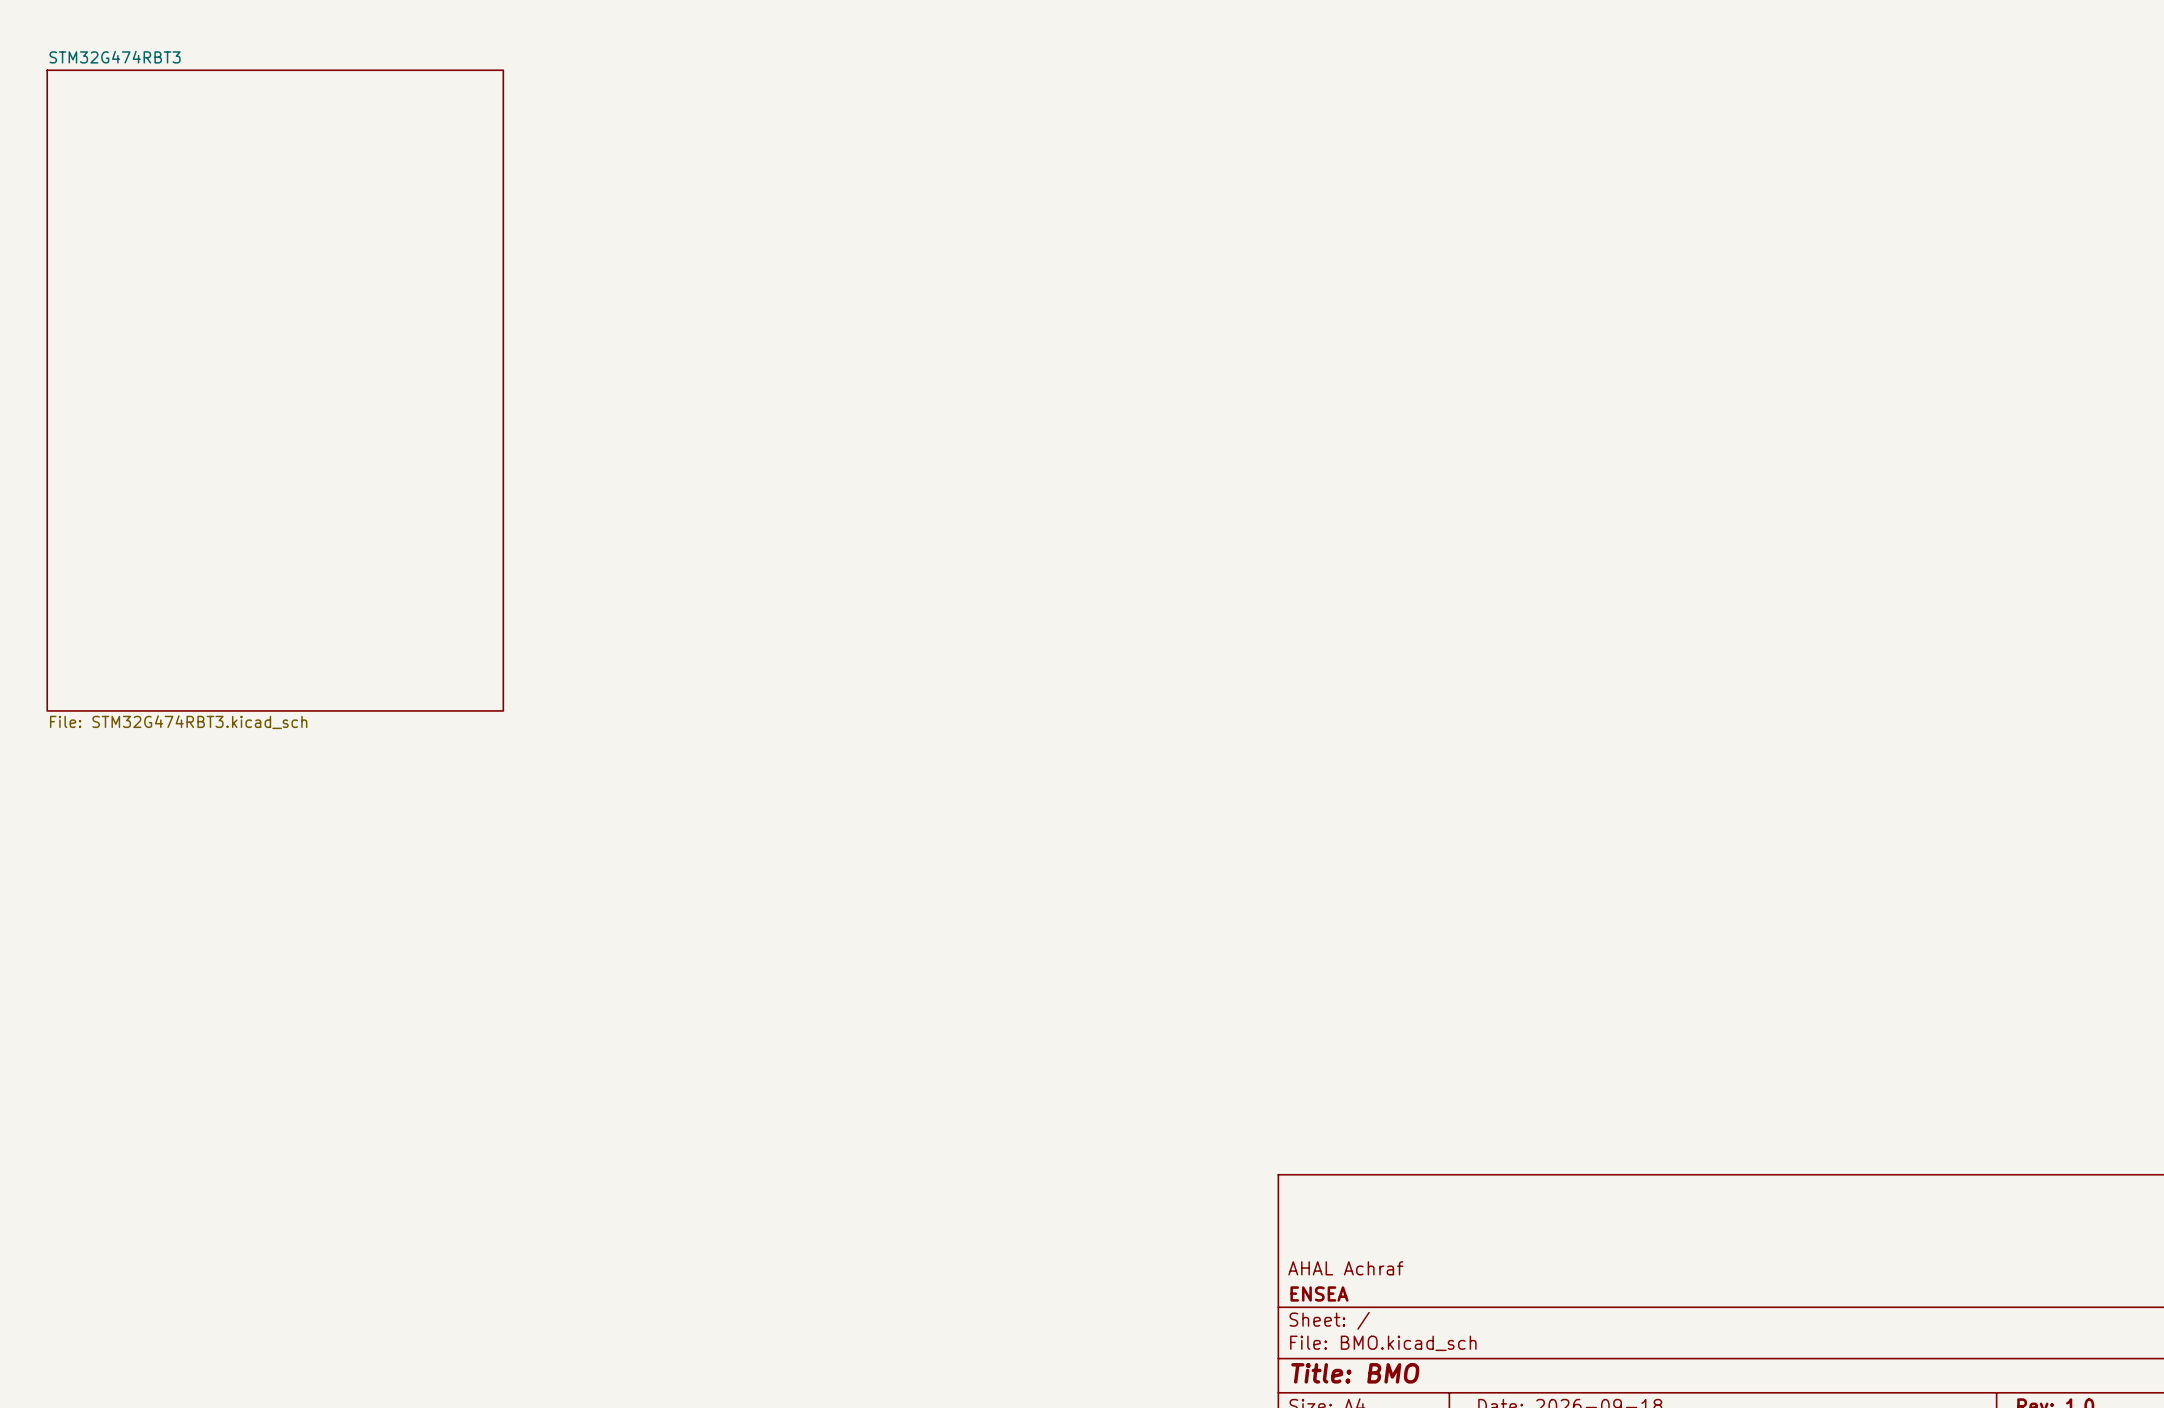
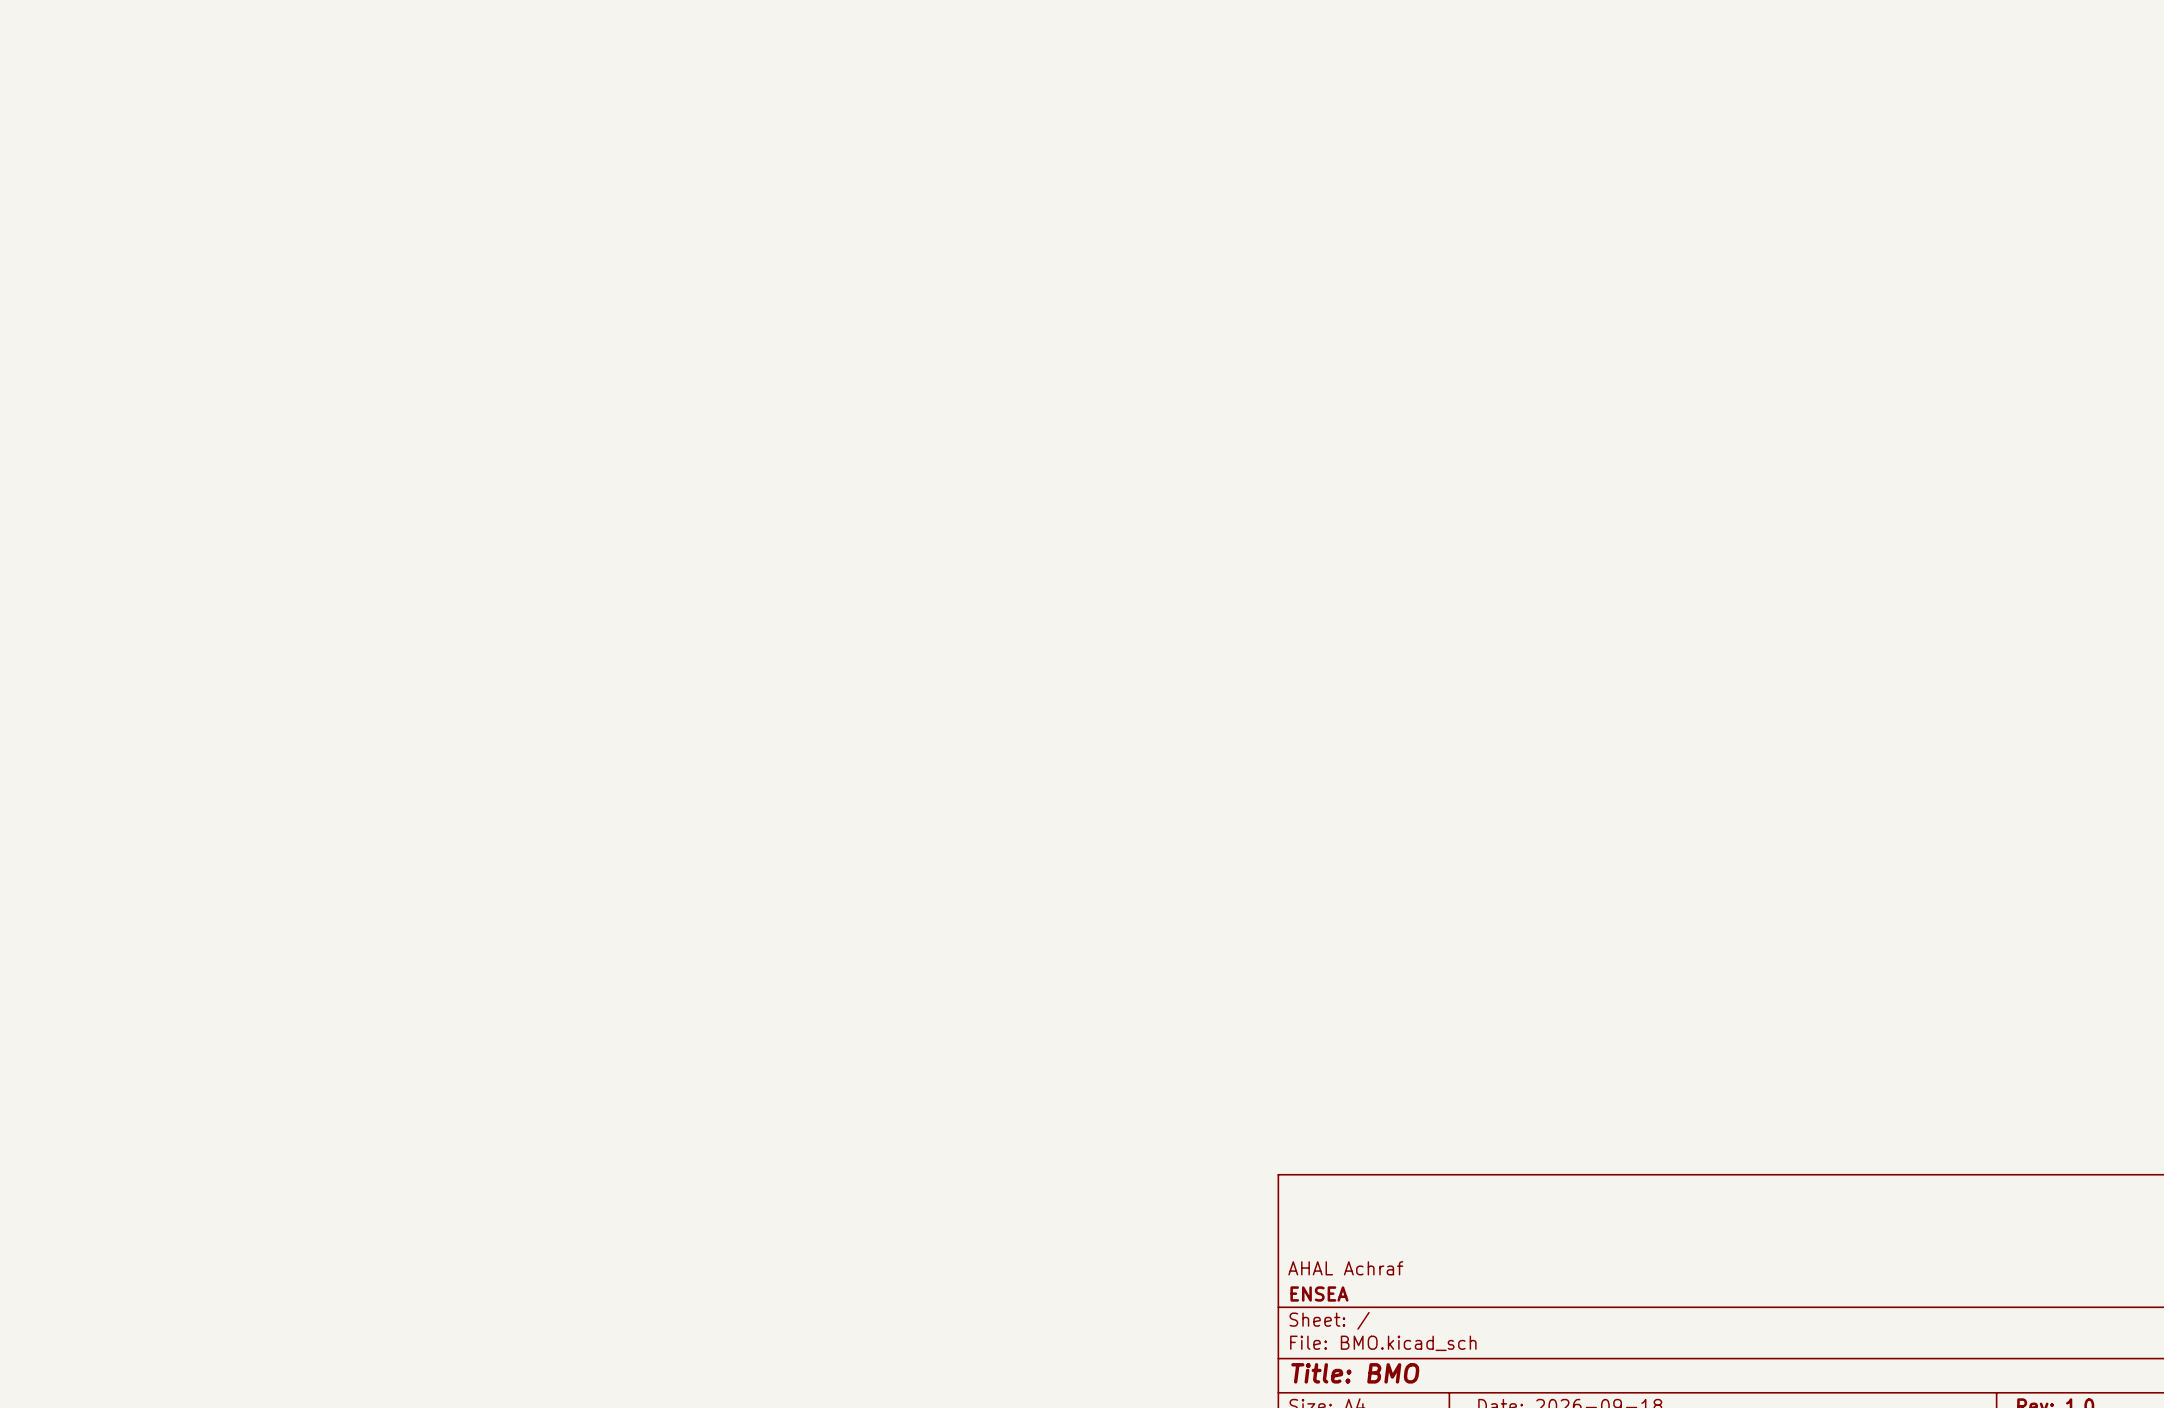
sheet STM32G474RBT3: File: STM32G474RBT3.kicad_sch (275, 390) -> none

